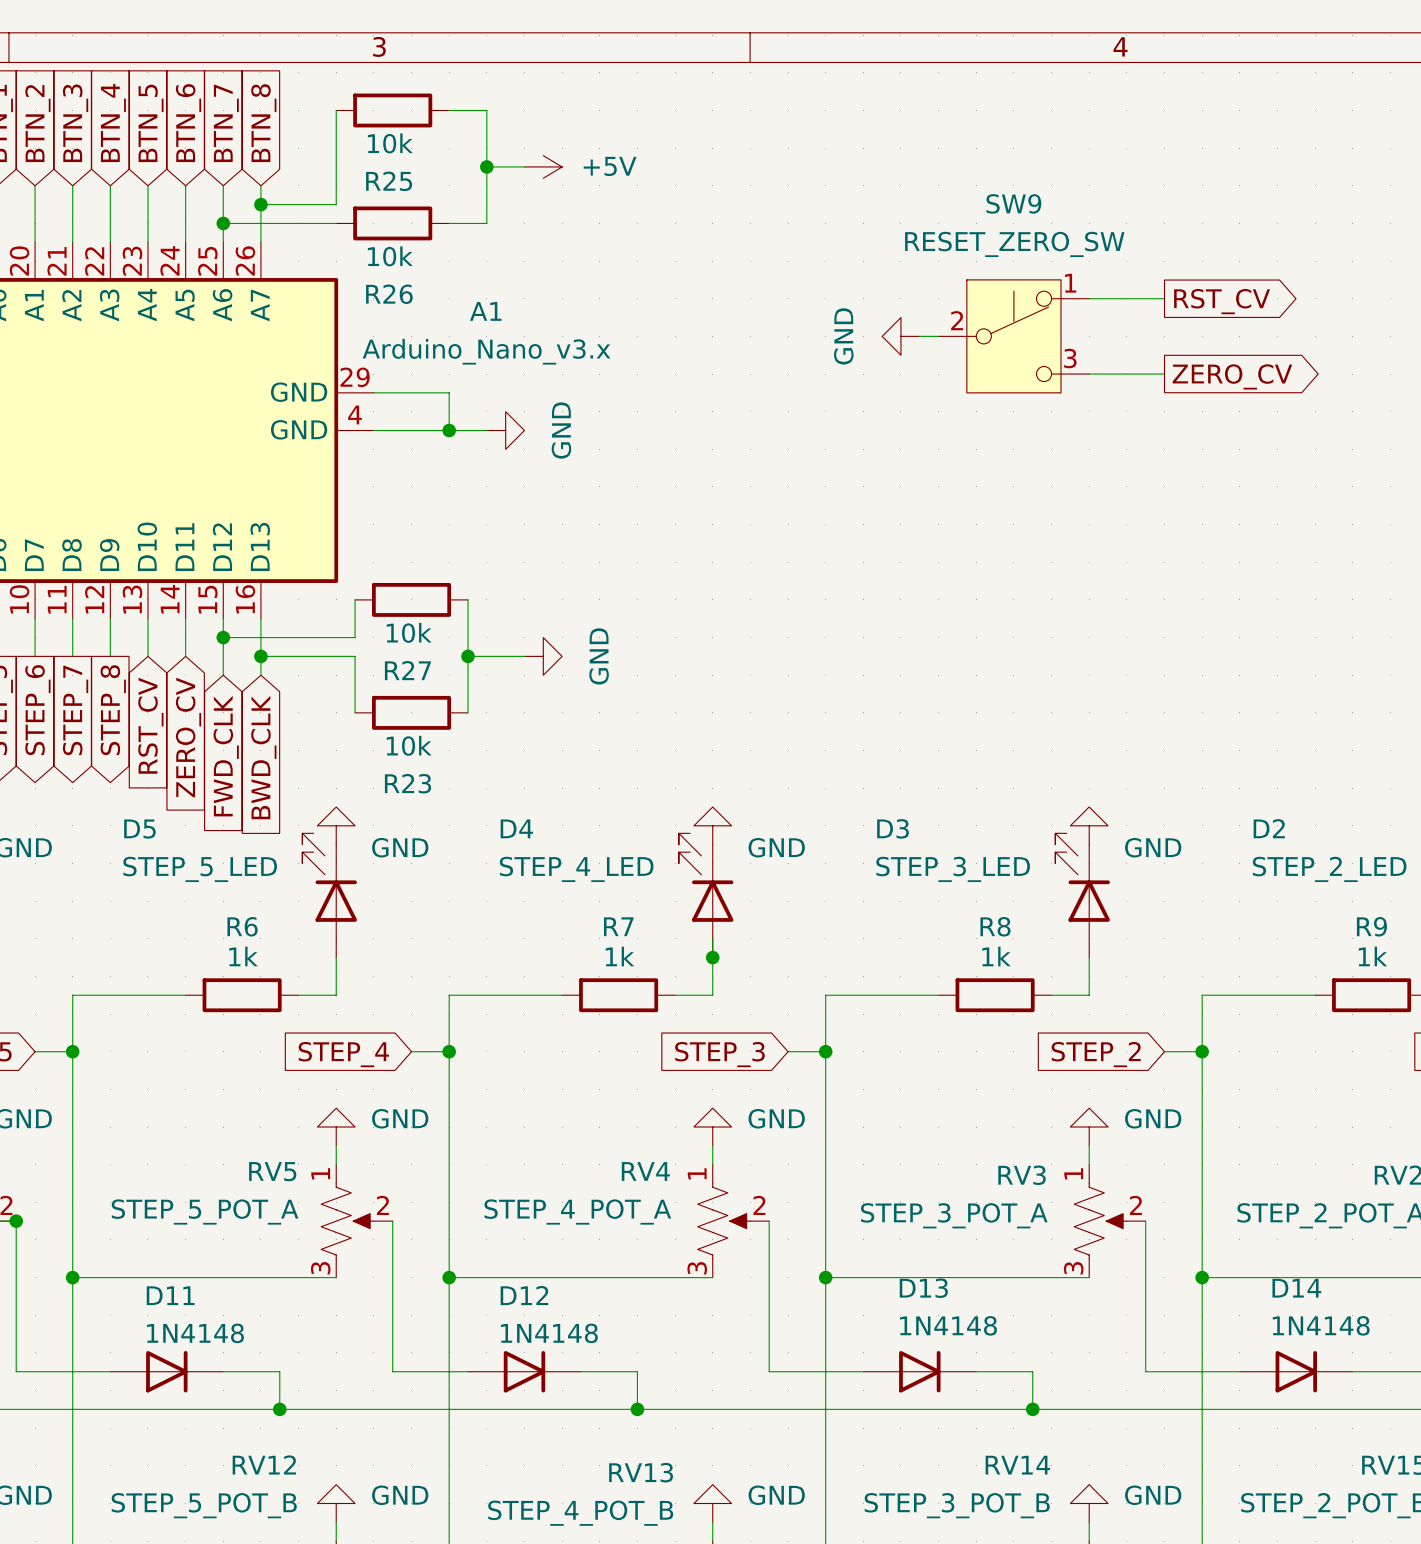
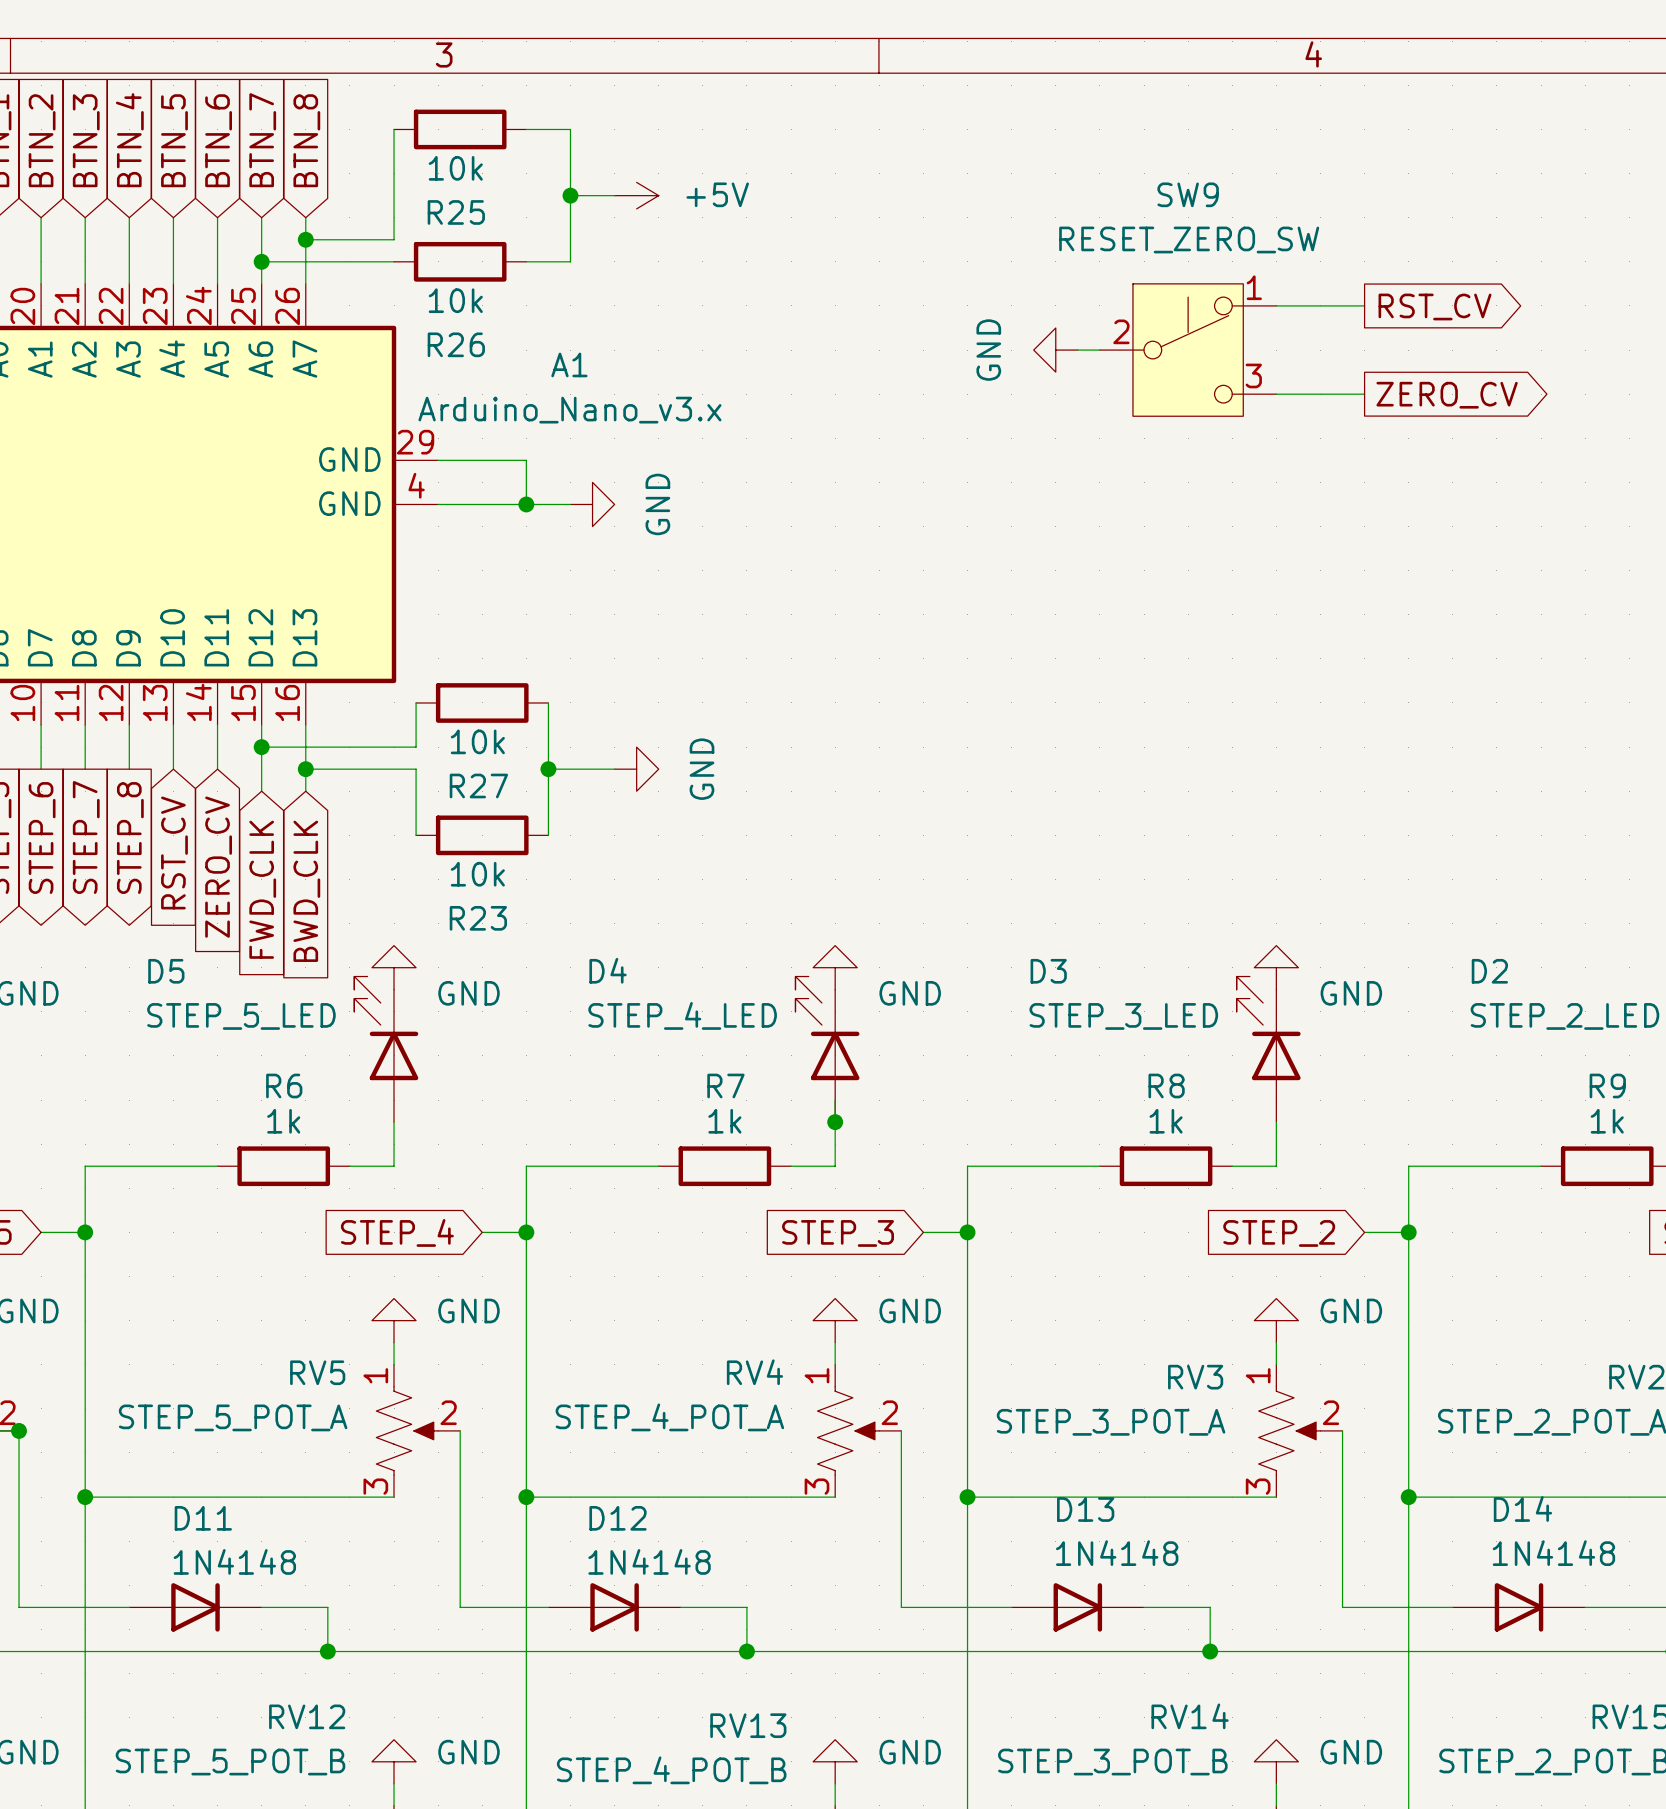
wire: (1089, 298) (1164, 298) -> (1276, 305) (1364, 305)
global label position: RST_CV (1222, 301) -> RST_CV (1435, 306)
power symbol position: GND (900, 336) -> GND (1055, 350)
wire: (919, 336) (938, 336) -> (1077, 350) (1099, 350)
SW9 position: (1013, 336) -> (1188, 350)
wire: (1089, 374) (1164, 374) -> (1276, 394) (1364, 394)
global label position: ZERO_CV (1232, 376) -> ZERO_CV (1447, 395)

